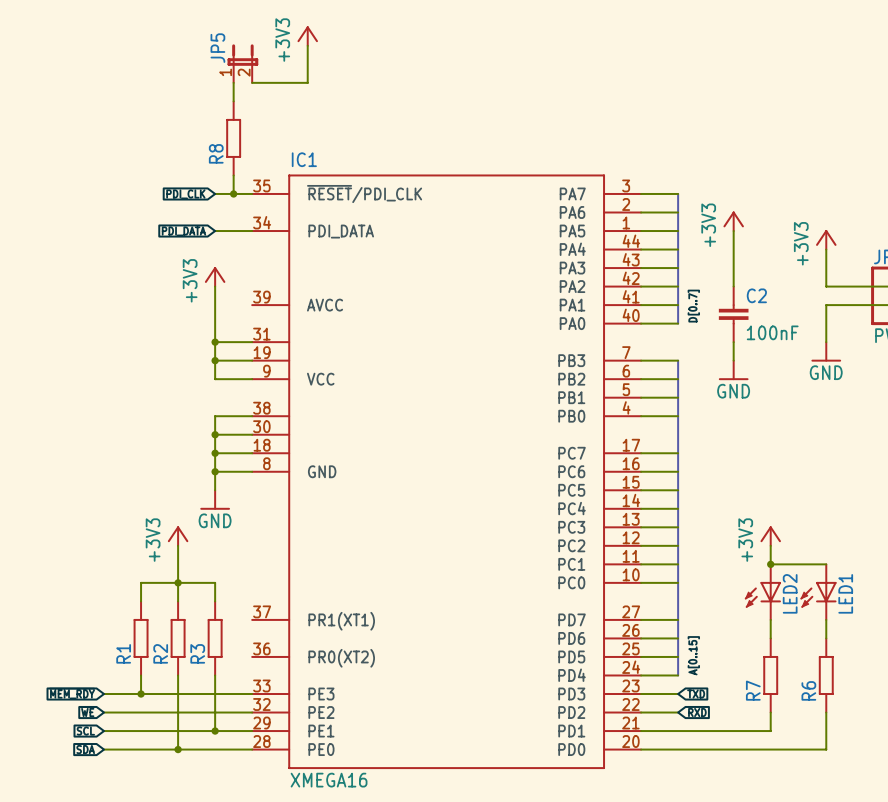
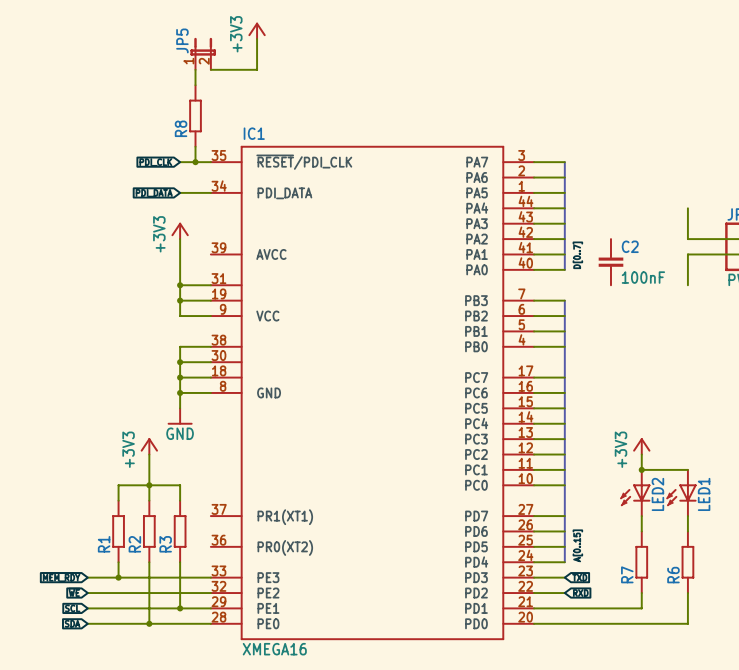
power symbol: +3V3 (733, 221) -> none
wire: (733, 231) (733, 286) -> none
power symbol: +3V3 (826, 239) -> none
wire: (733, 342) (733, 360) -> none
power symbol: GND (826, 351) -> none
power symbol: GND (733, 370) -> none

